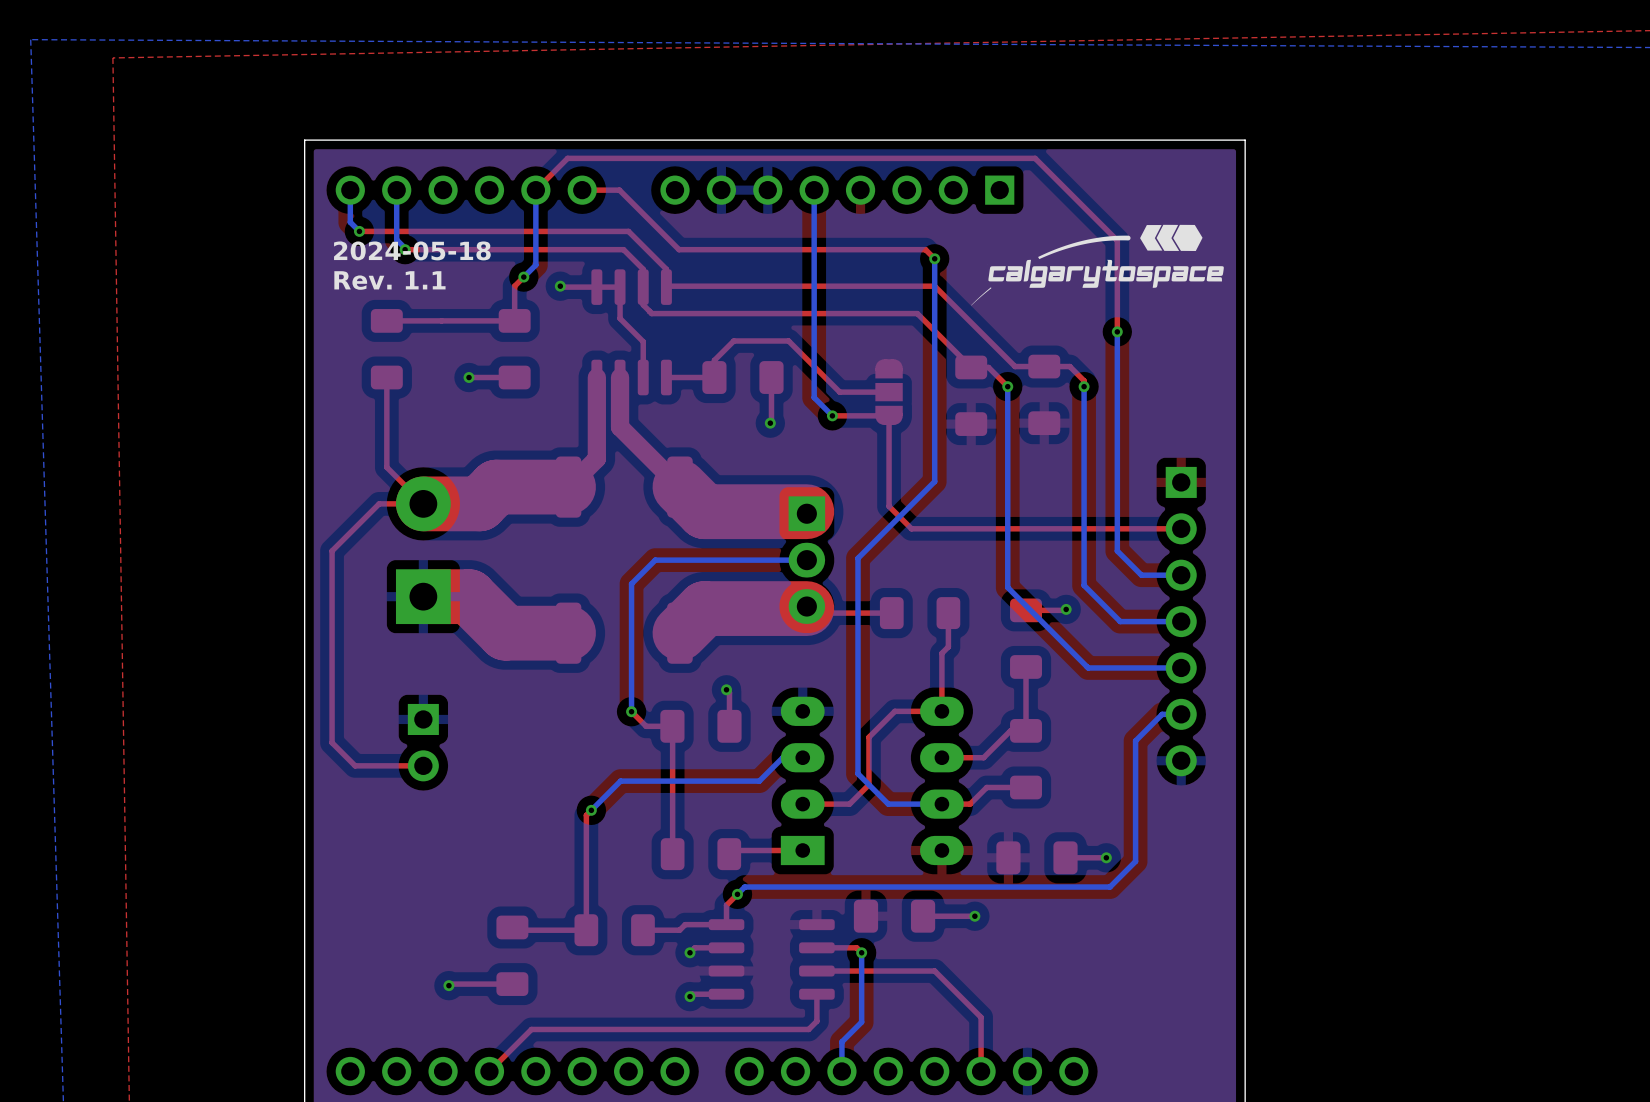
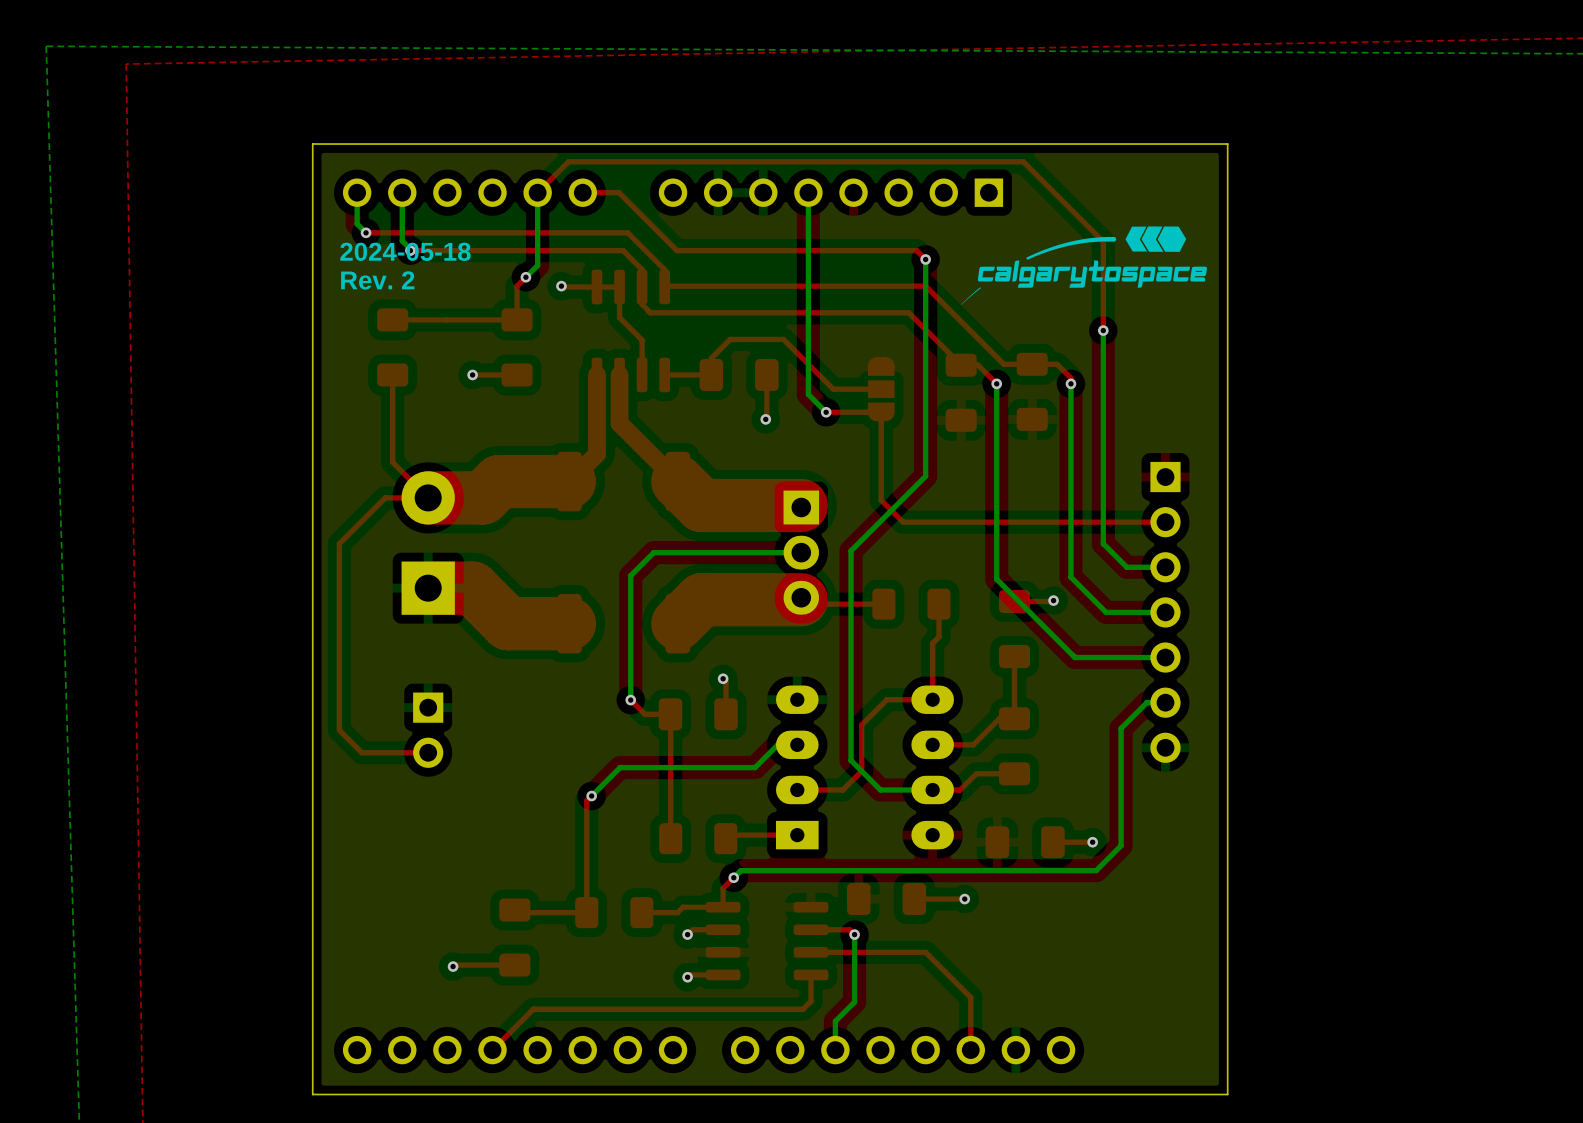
text: Rev. 1.1 (389, 280) -> Rev. 2 (377, 280)

